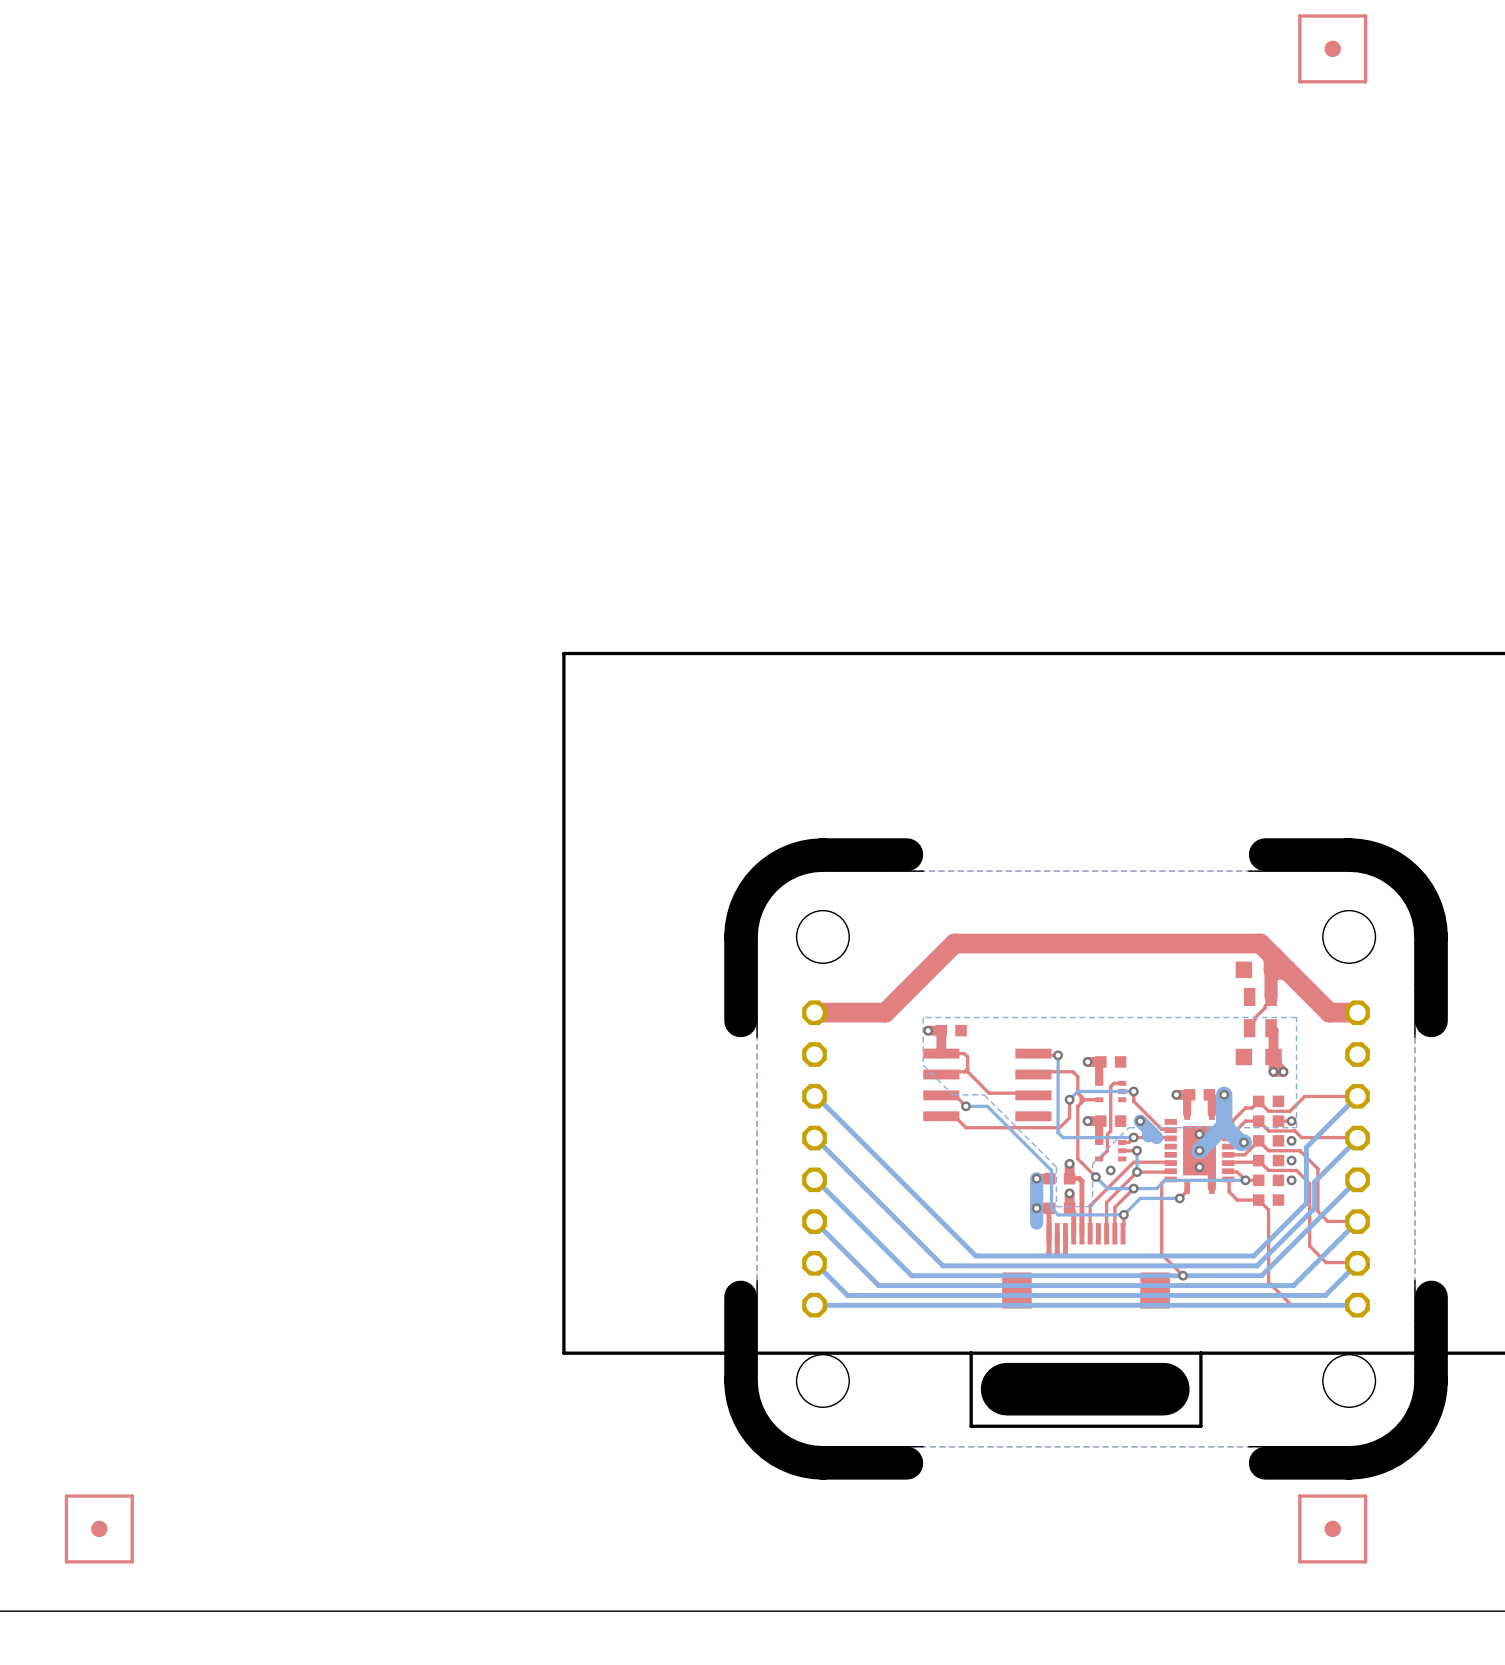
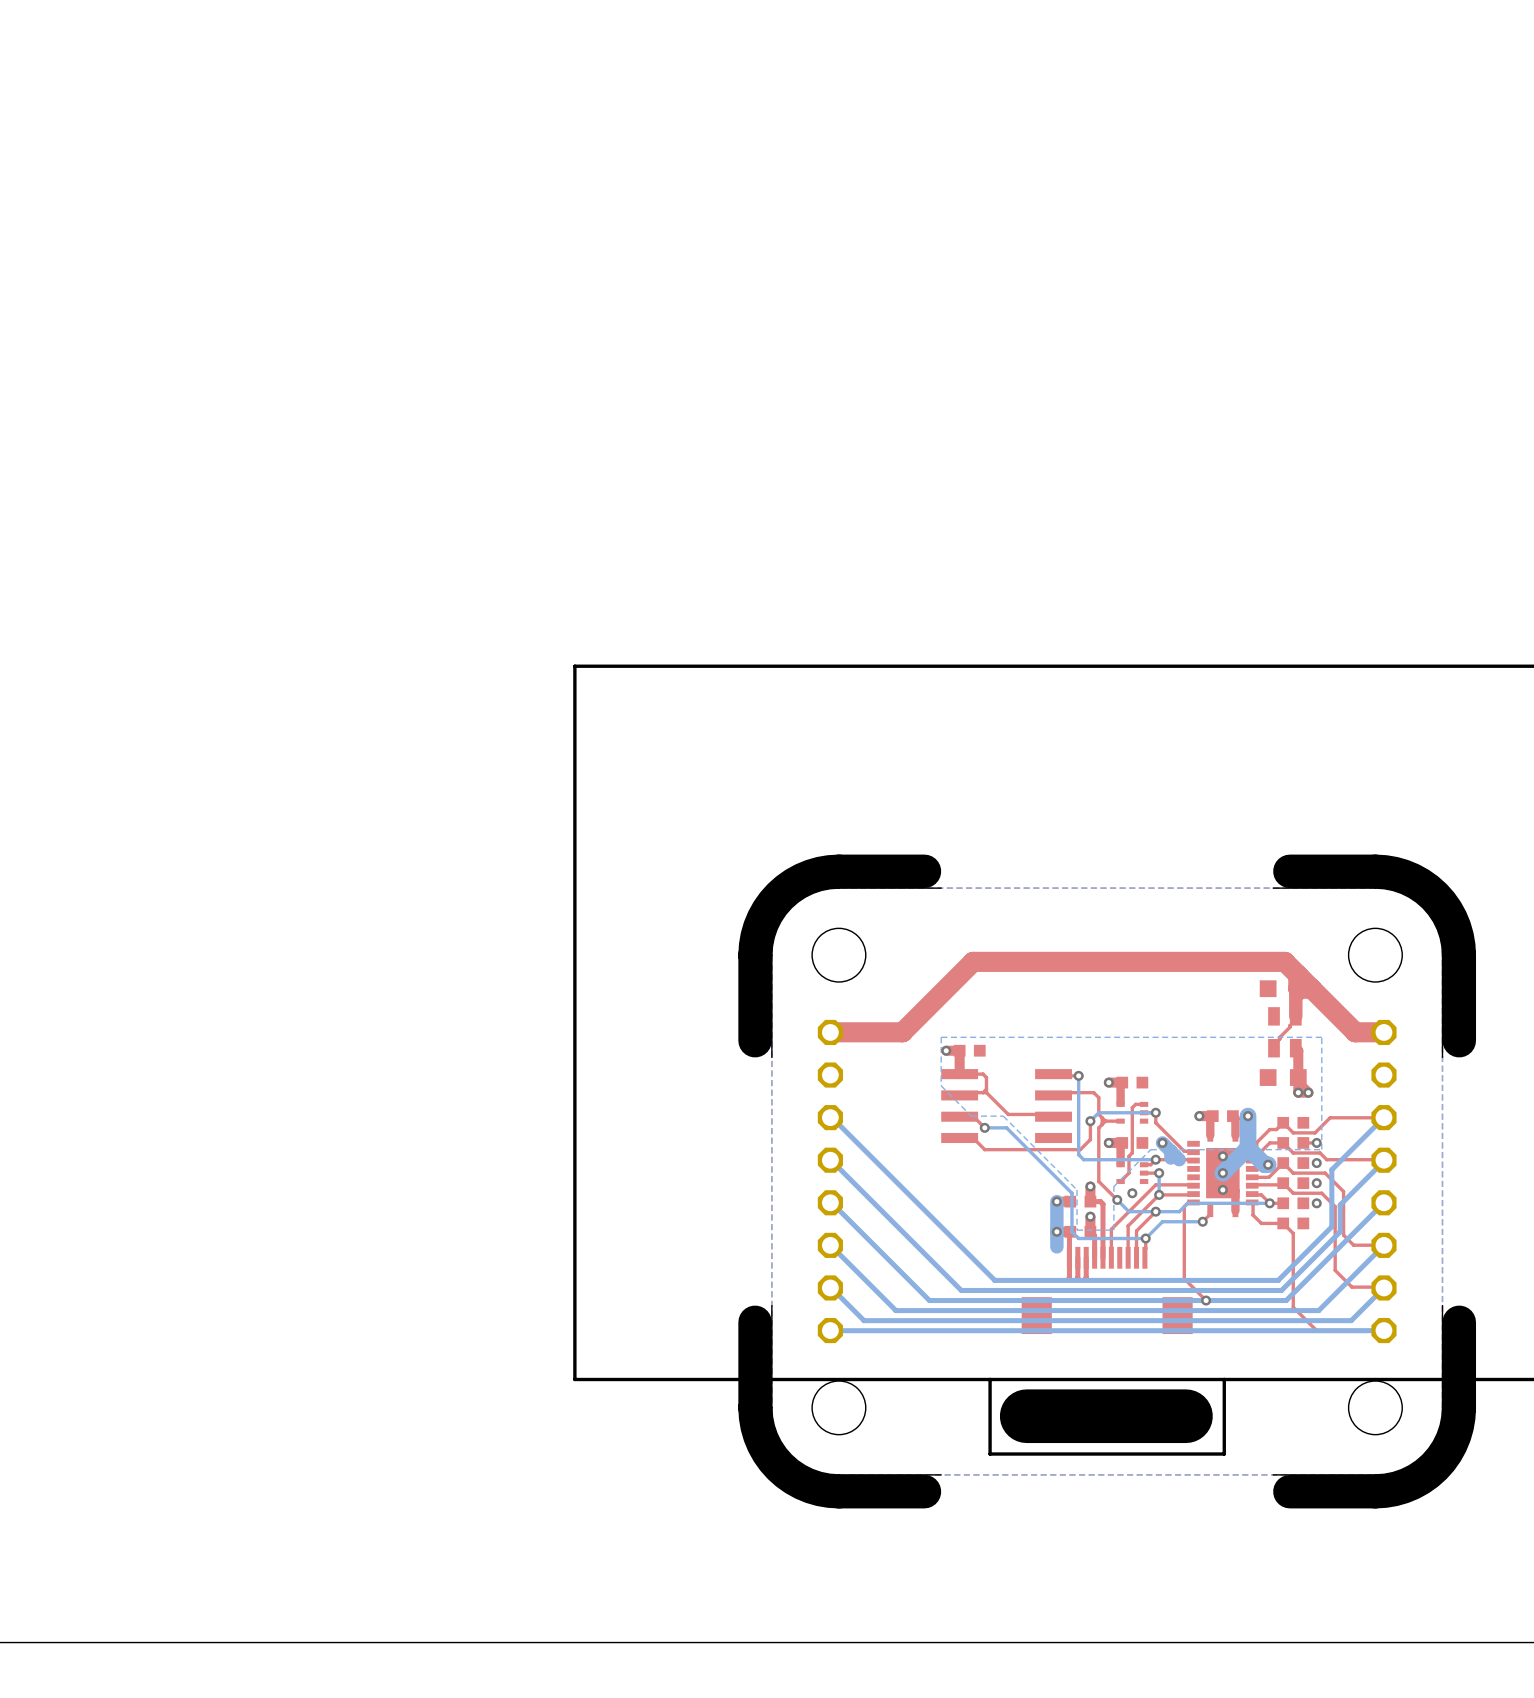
part: (1332, 48) -> none
part: (99, 1528) -> none
part: (1332, 1528) -> none

